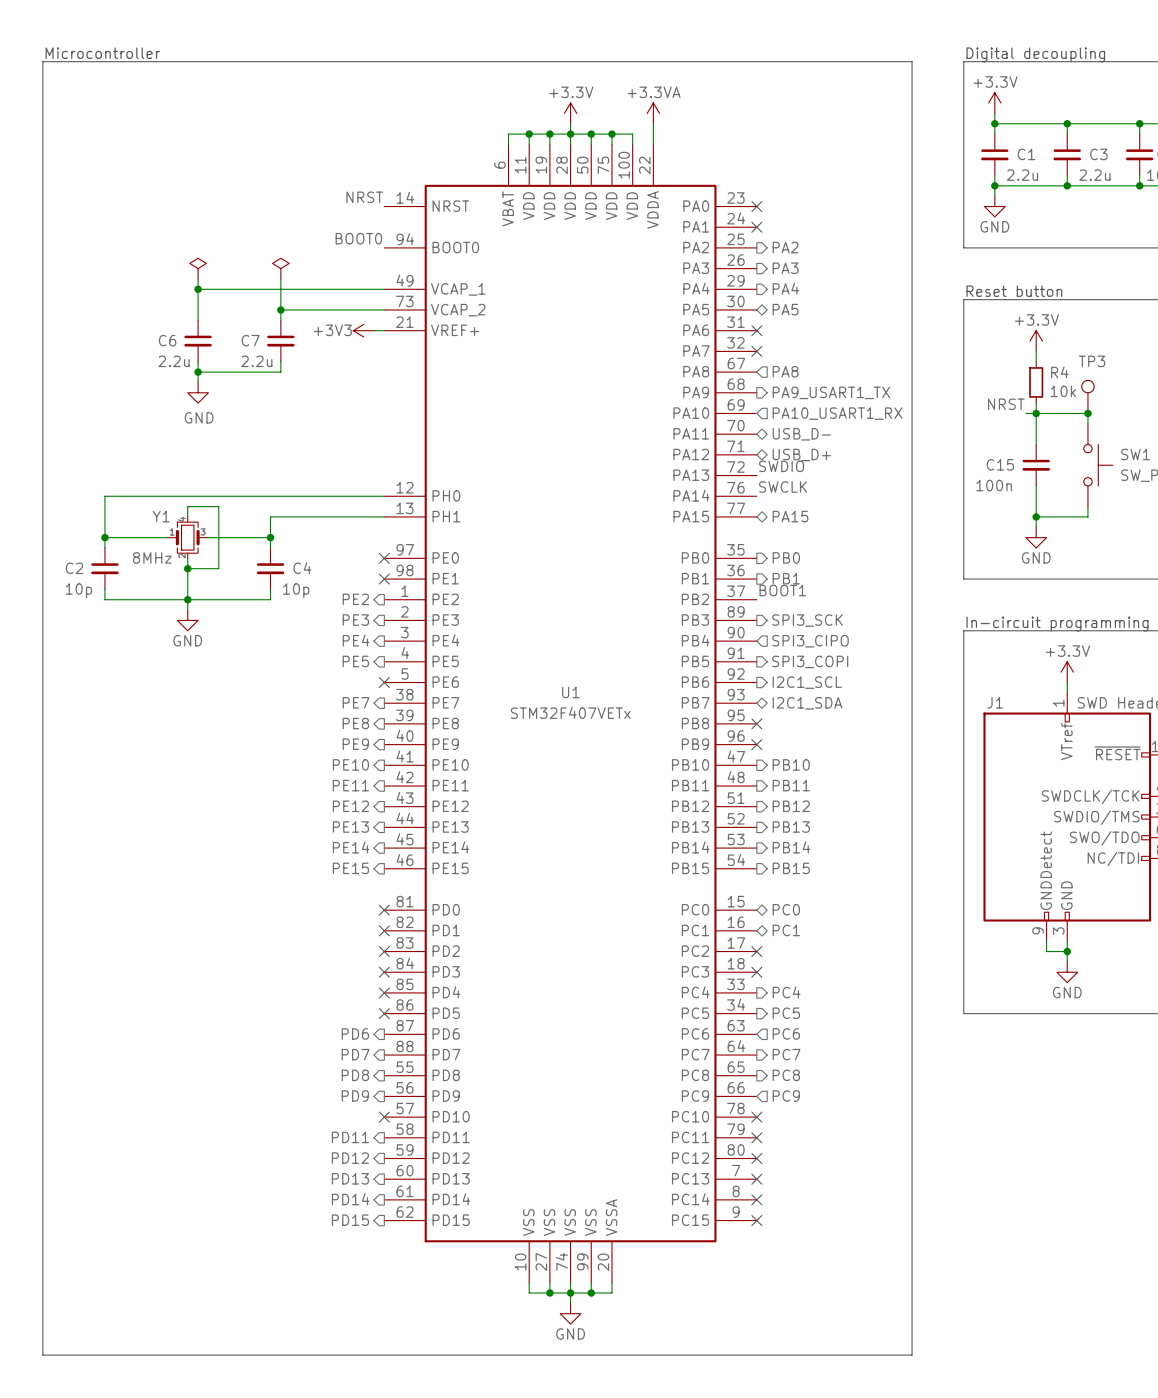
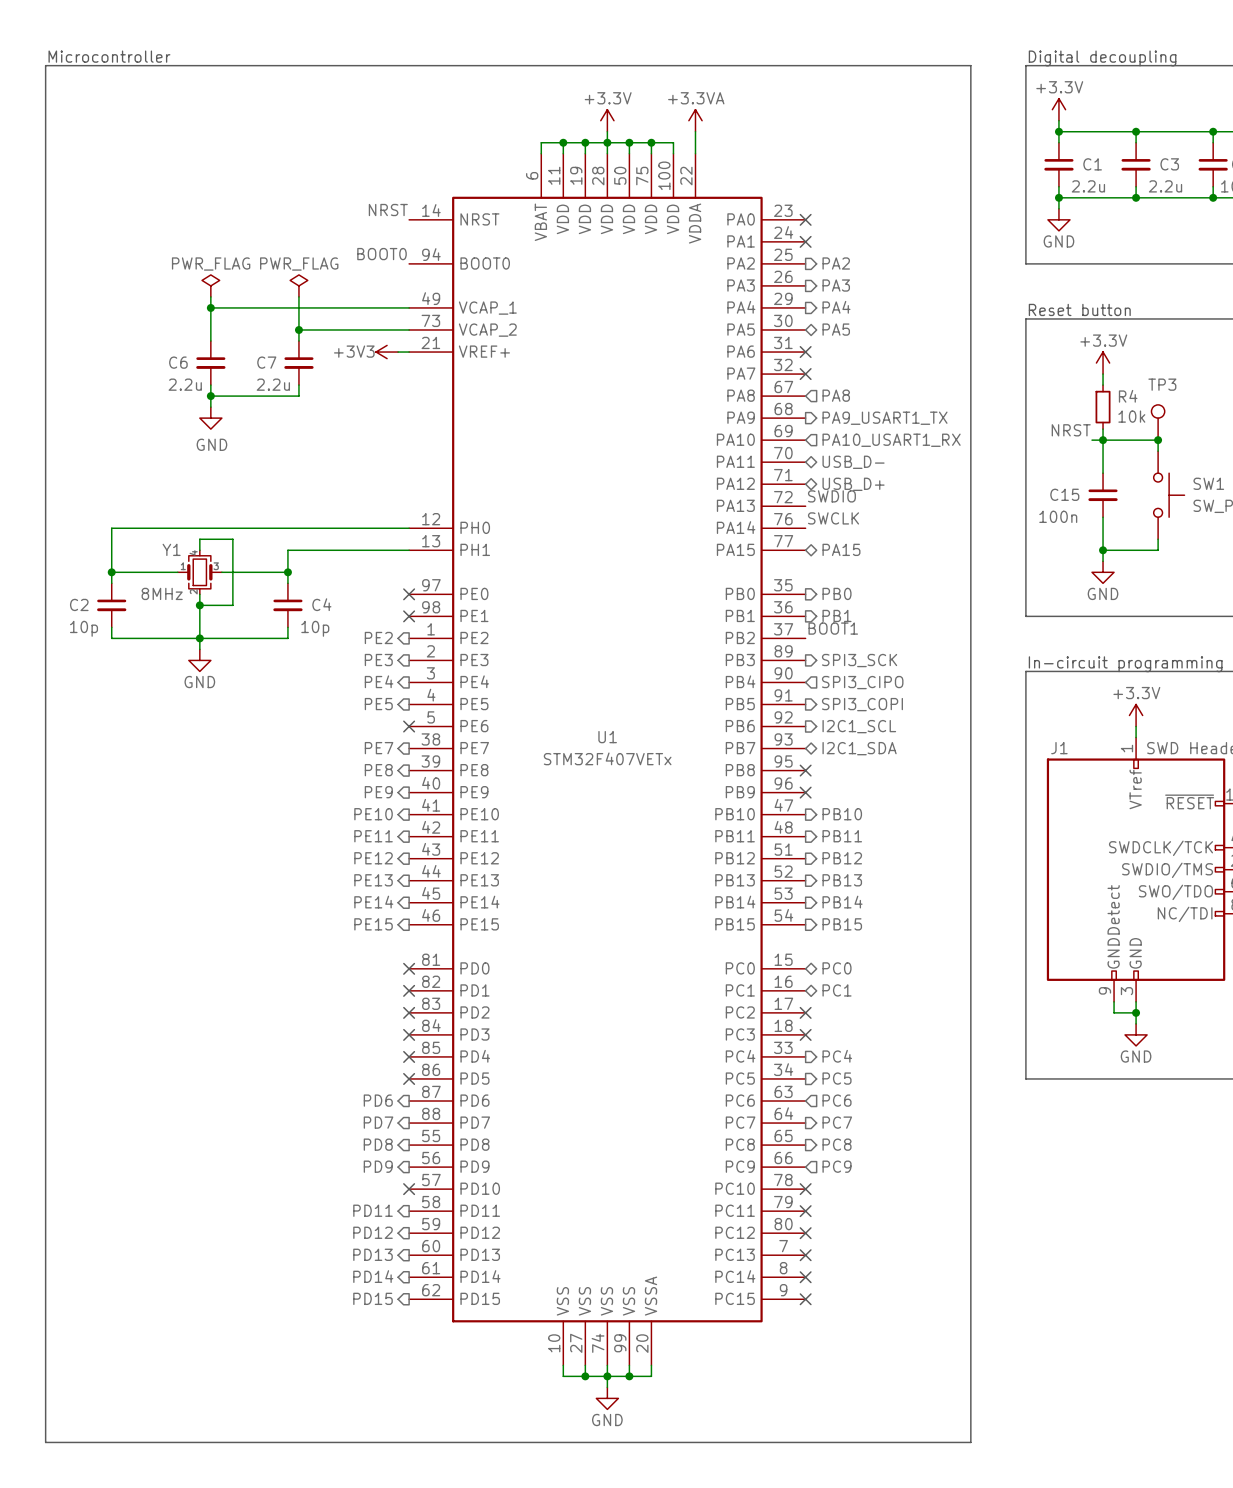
power symbol text: none -> PWR_FLAG (211, 264)
power symbol text: none -> PWR_FLAG (299, 264)

